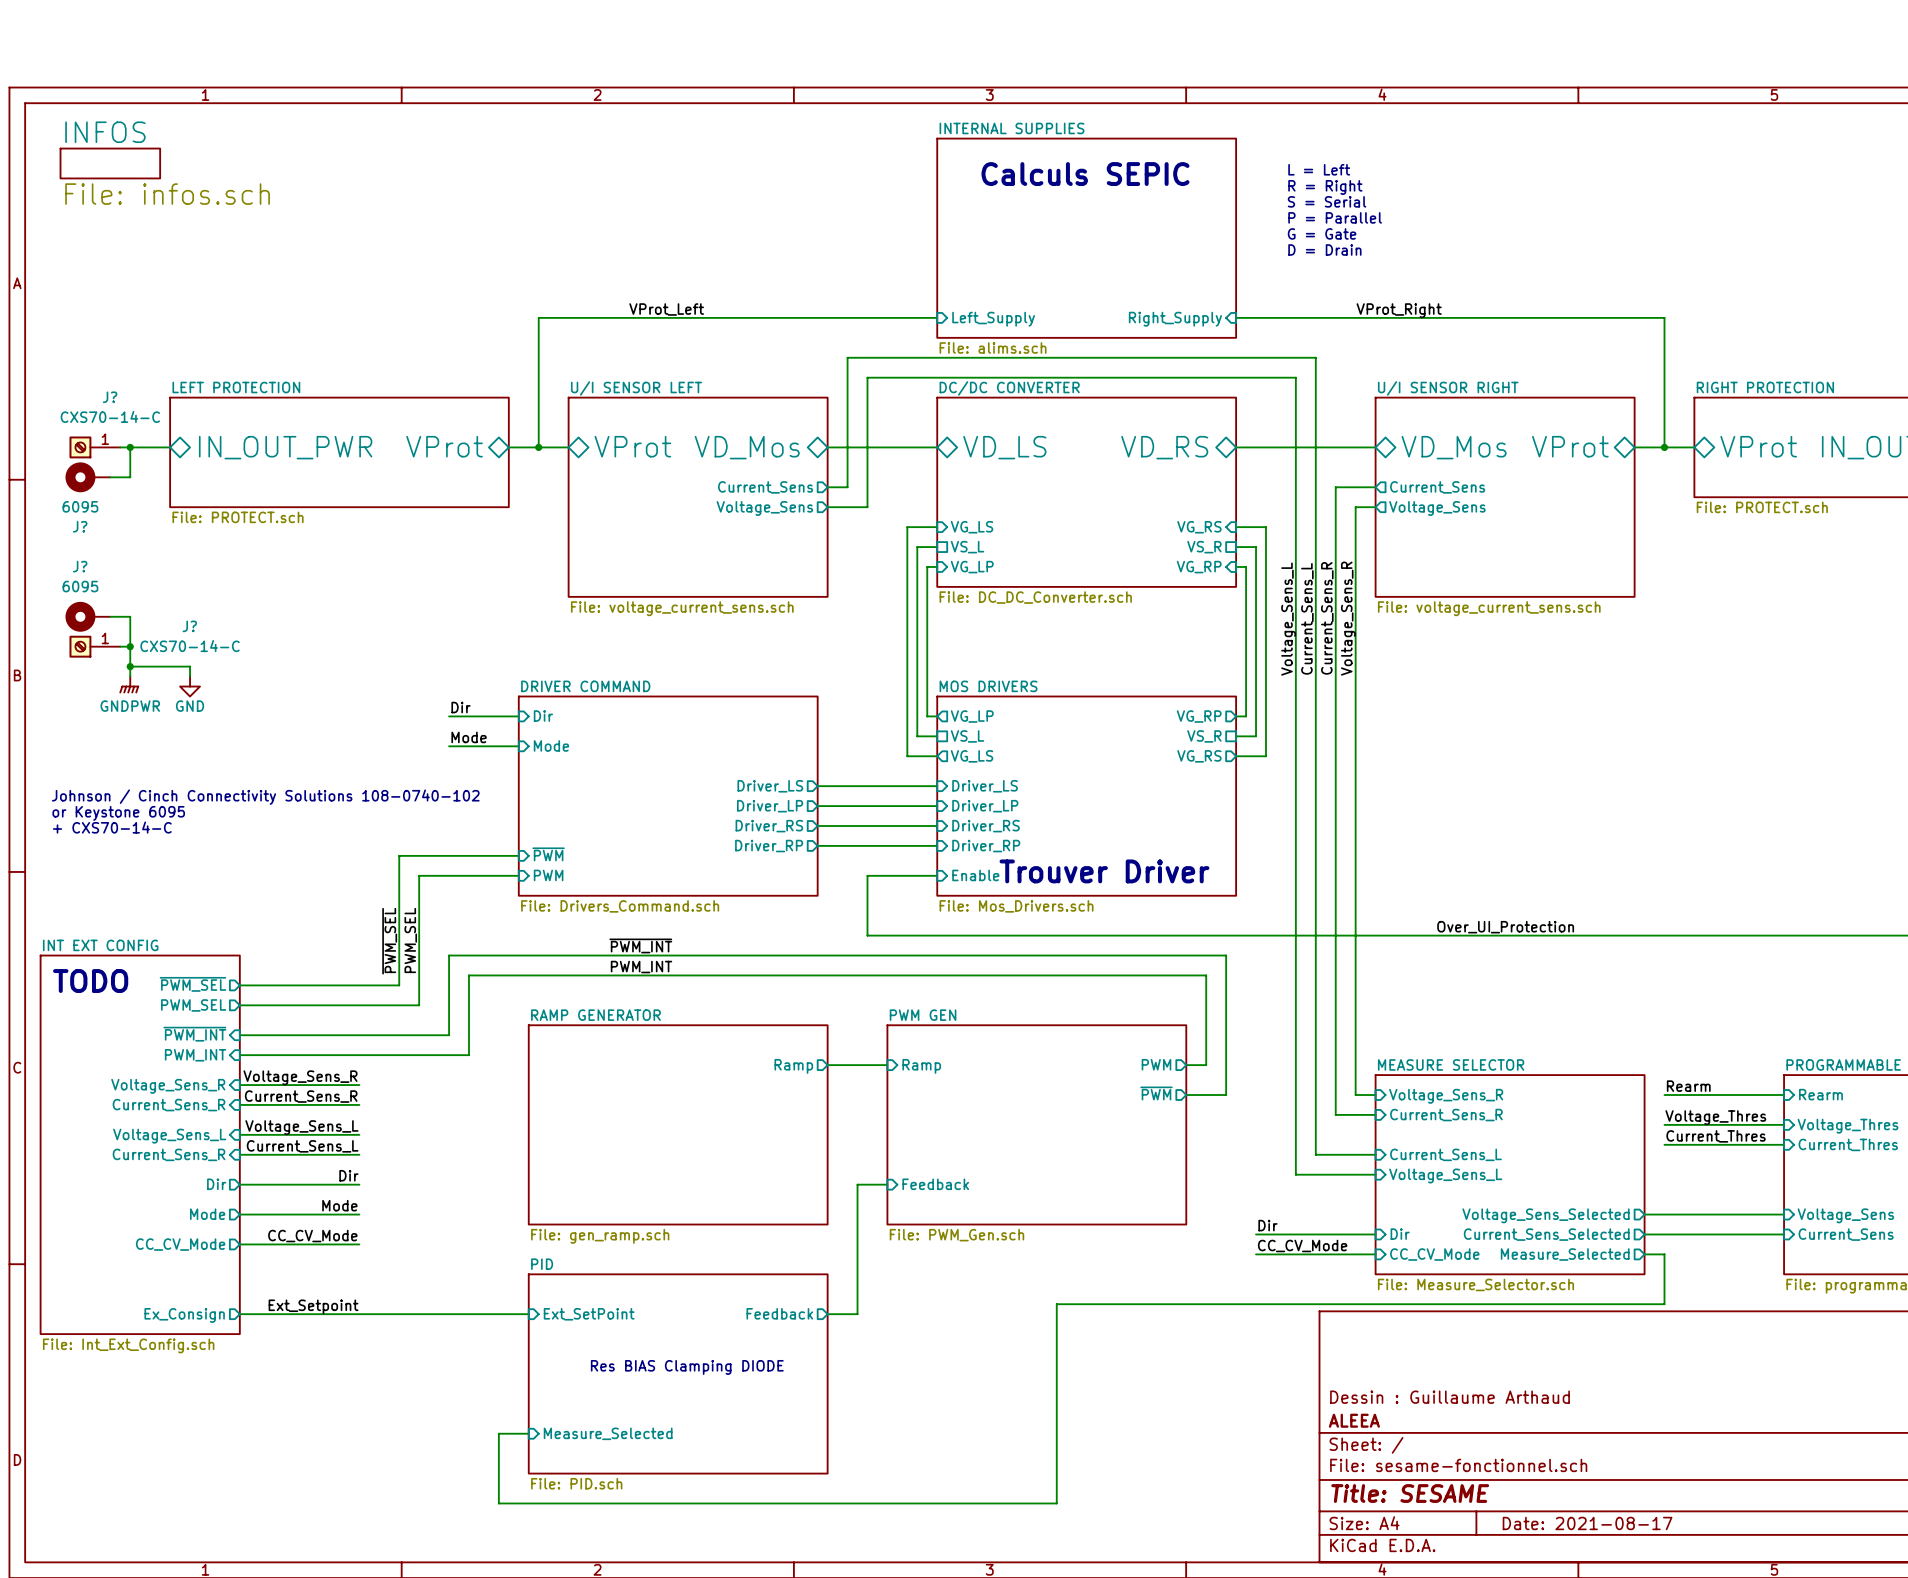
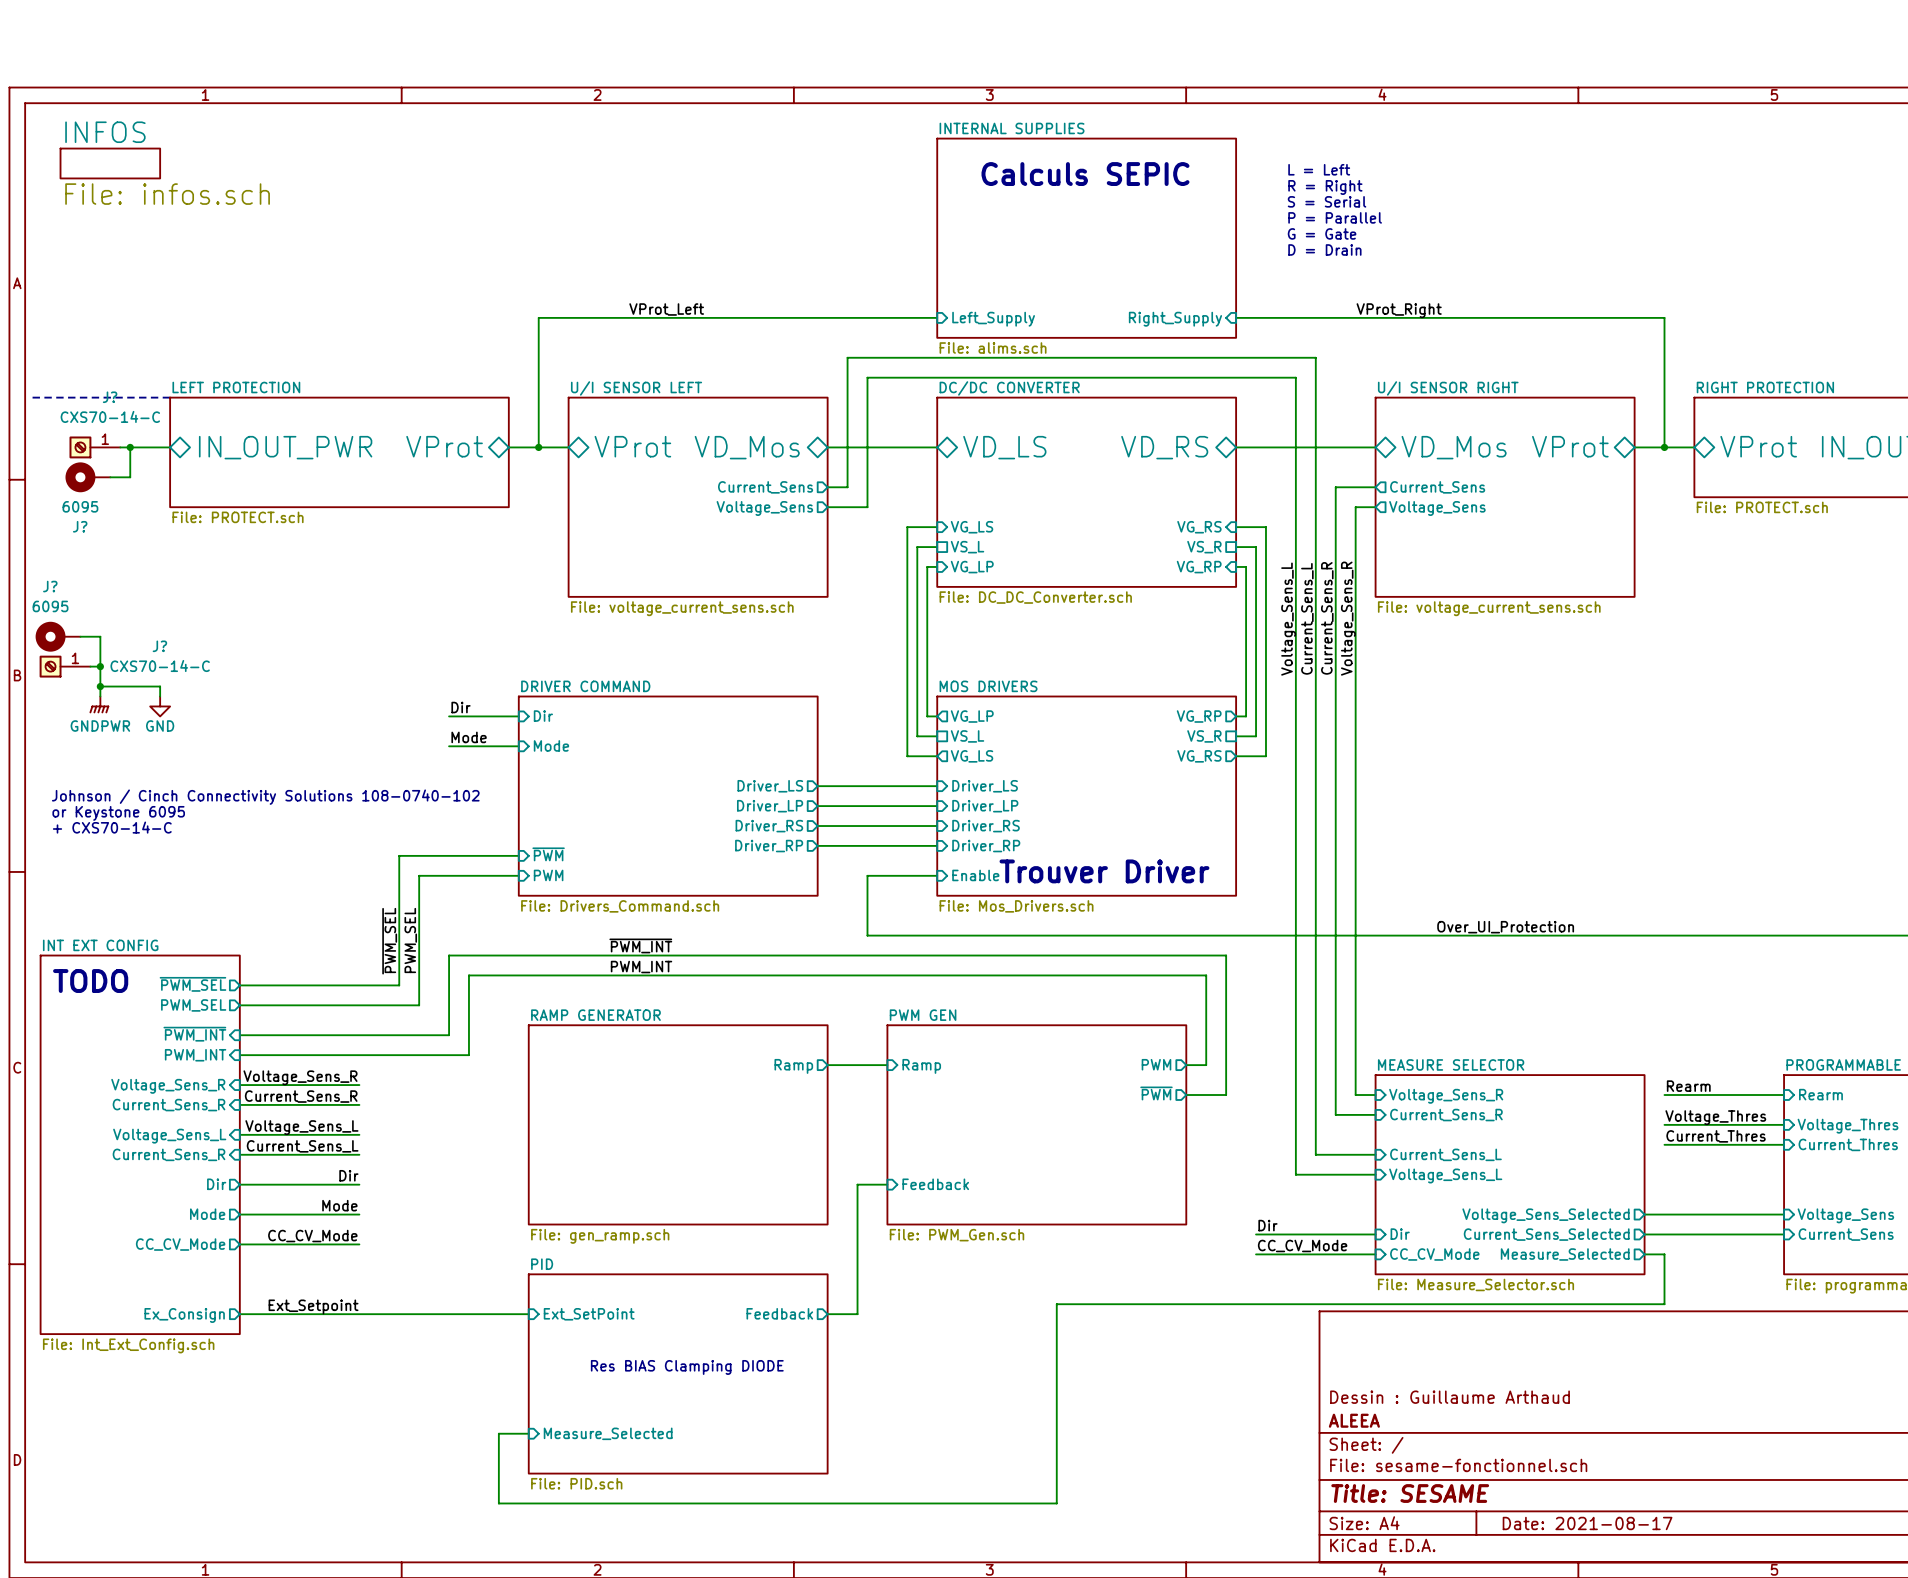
line: none -> (30, 397) (170, 397)
J? position: (87, 616) -> (58, 636)
wire: (110, 616) (130, 616) (130, 676) -> (80, 636) (100, 636) (100, 696)
J? position: (94, 646) -> (65, 666)
wire: (120, 646) (130, 646) -> (90, 666) (100, 666)
junction: (130, 646) -> none
junction: none -> (100, 666)
wire: (130, 666) (190, 666) (190, 676) -> (100, 686) (160, 686) (160, 696)
junction: (130, 666) -> none
power symbol position: GNDPWR (129, 684) -> GNDPWR (99, 704)
junction: none -> (100, 686)
power symbol position: GND (190, 686) -> GND (160, 706)

